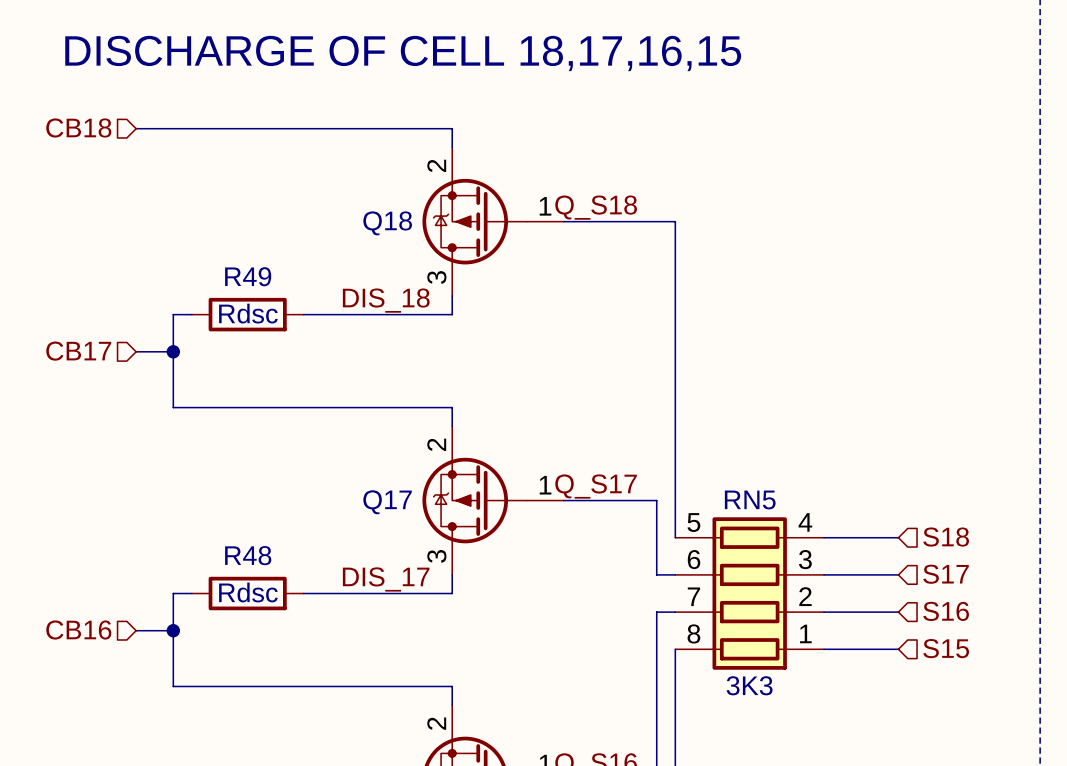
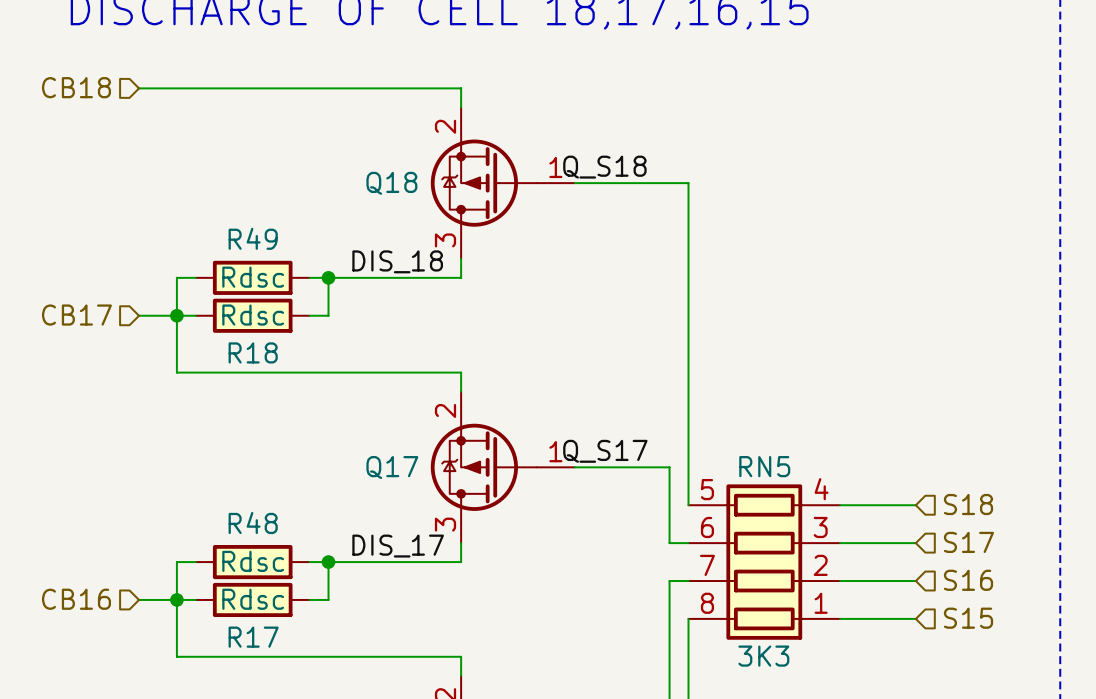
R49 symbol: [191, 297, 304, 332] -> [195, 260, 310, 295]
wire: none -> (328, 277) (328, 315) (309, 315)
junction: none -> (328, 277)
wire: none -> (176, 315) (195, 315)
R18: none -> Rdsc (252, 315)
R48 symbol: [191, 576, 304, 611] -> [195, 545, 310, 580]
wire: none -> (328, 562) (328, 599) (309, 599)
junction: none -> (328, 562)
wire: none -> (176, 599) (195, 599)
R17: none -> Rdsc (252, 599)

